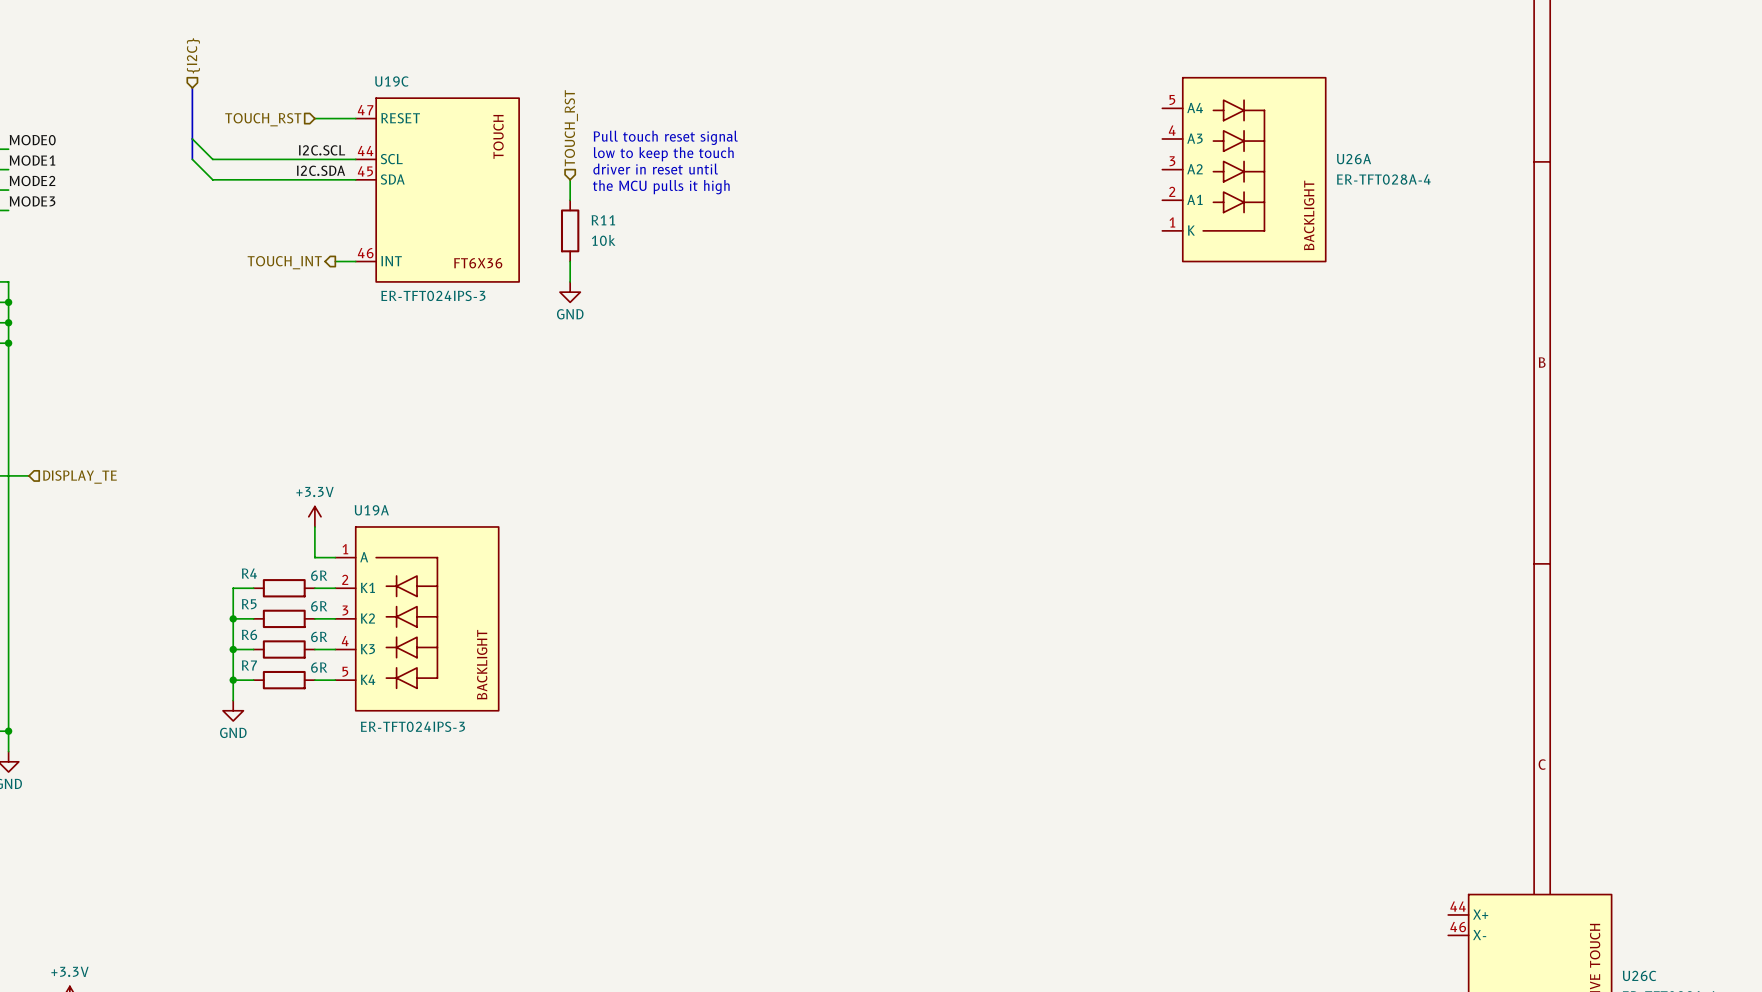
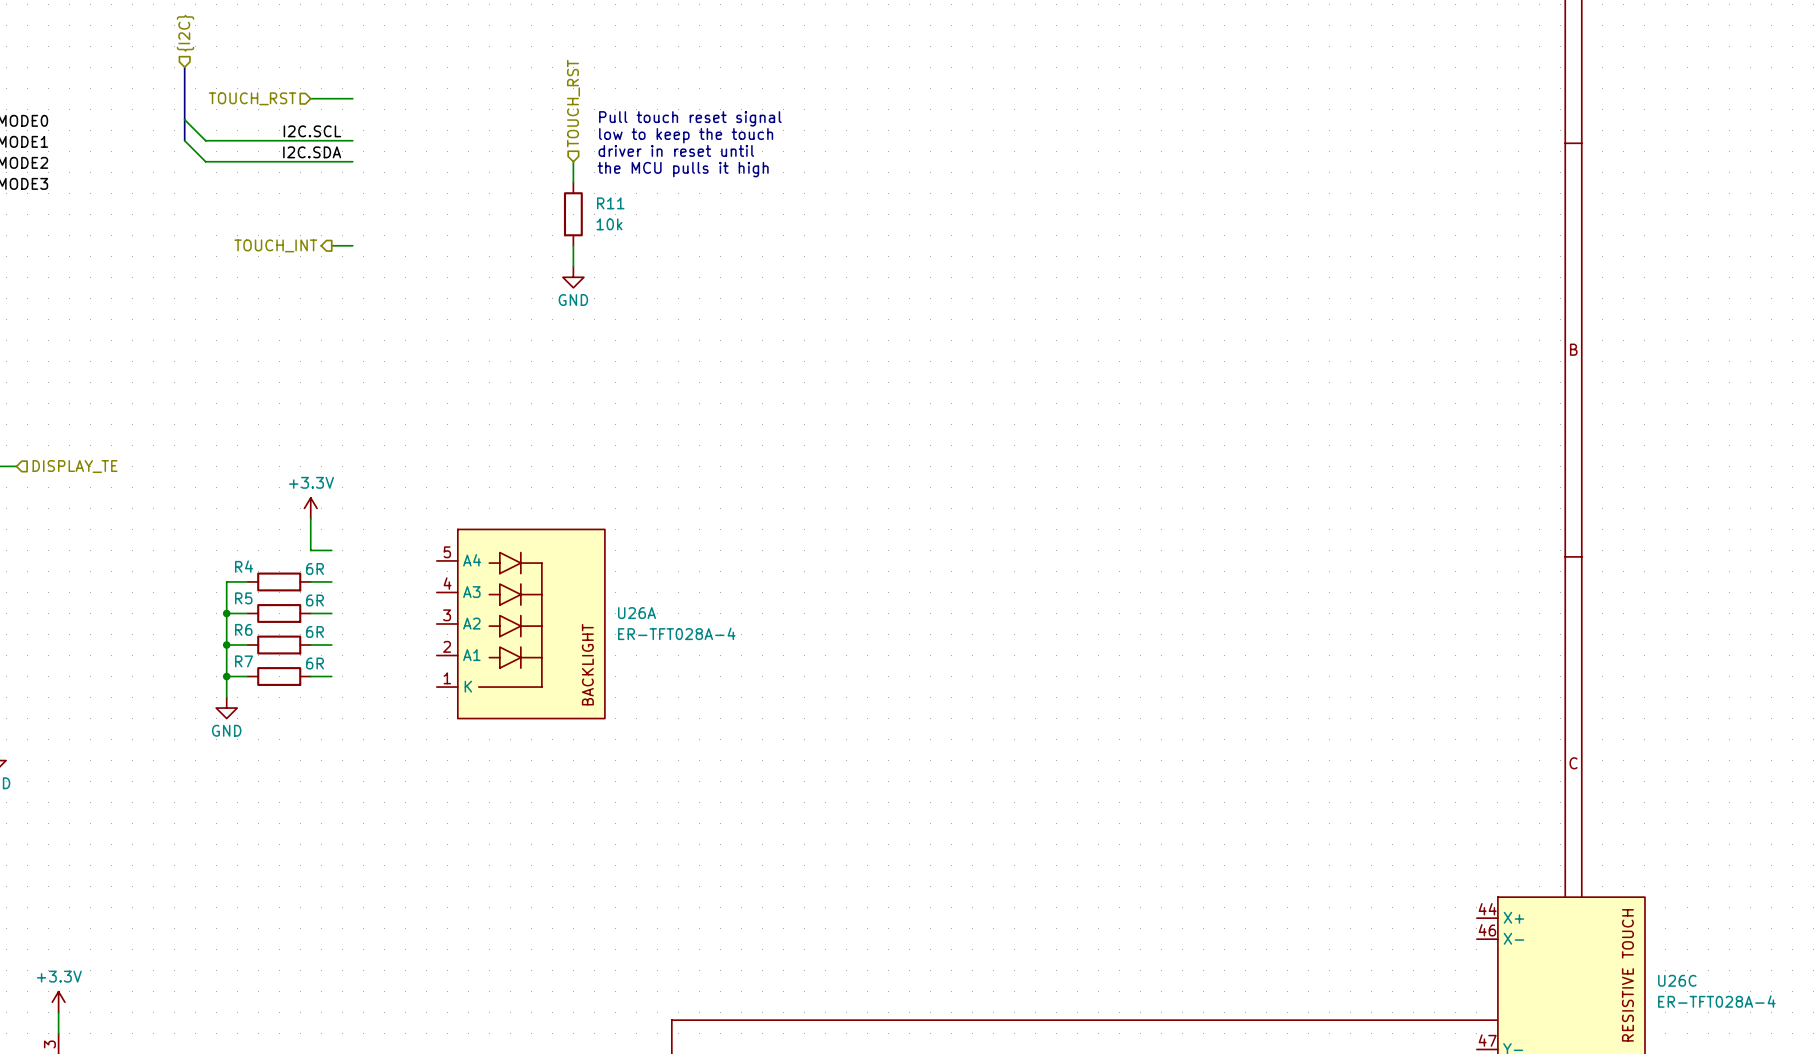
U26A position: (1244, 169) -> (520, 623)
U19C: ER-TFT024IPS-3 (437, 190) -> none
U19A: ER-TFT024IPS-3 (417, 618) -> none

